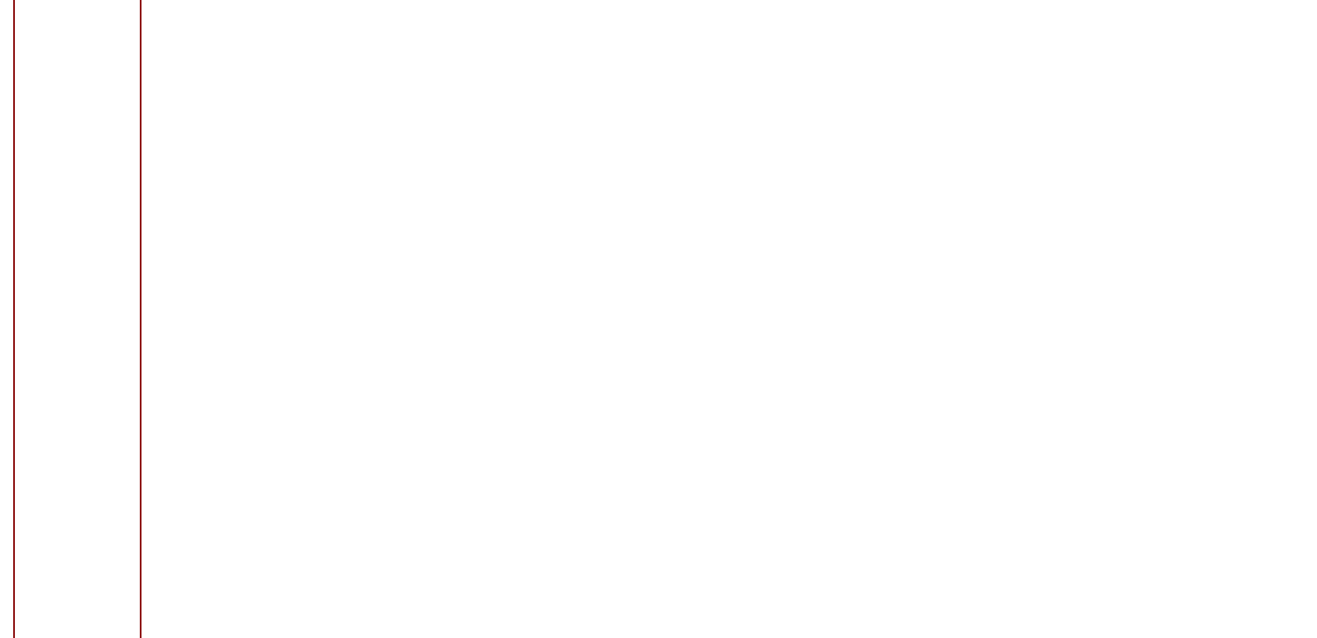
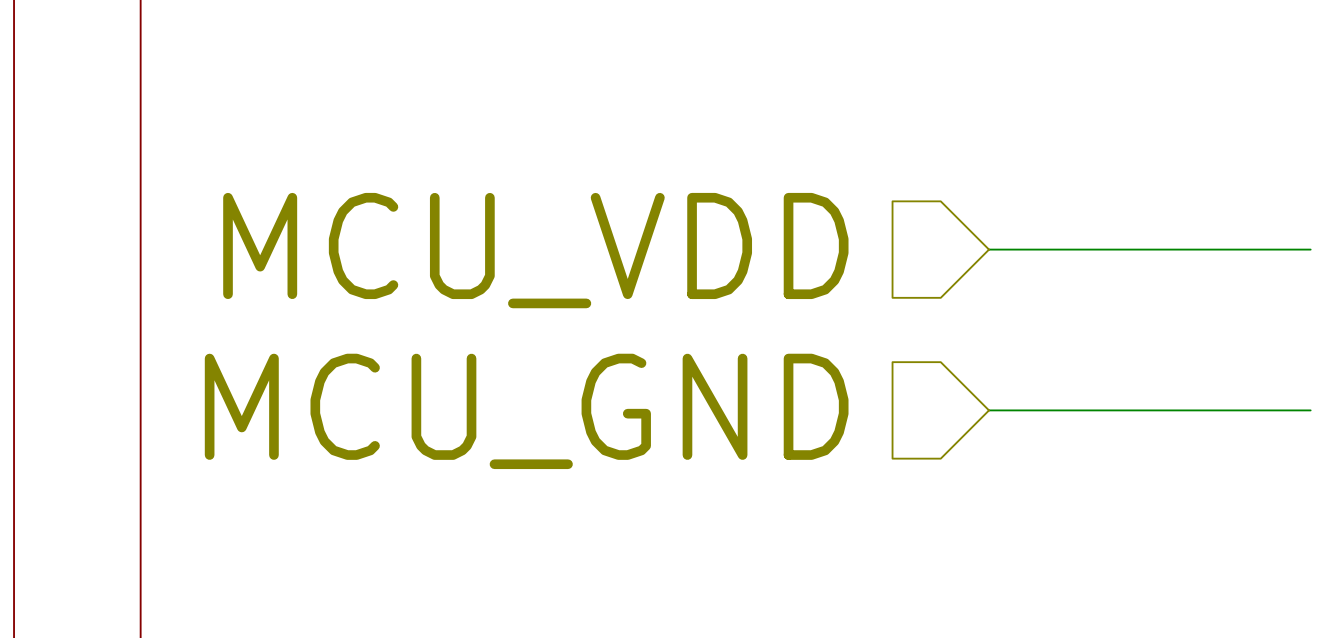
wire: none -> (989, 249) (1310, 249)
hierarchical label: none -> MCU_VDD (535, 250)
wire: none -> (989, 410) (1310, 410)
hierarchical label: none -> MCU_GND (526, 411)

